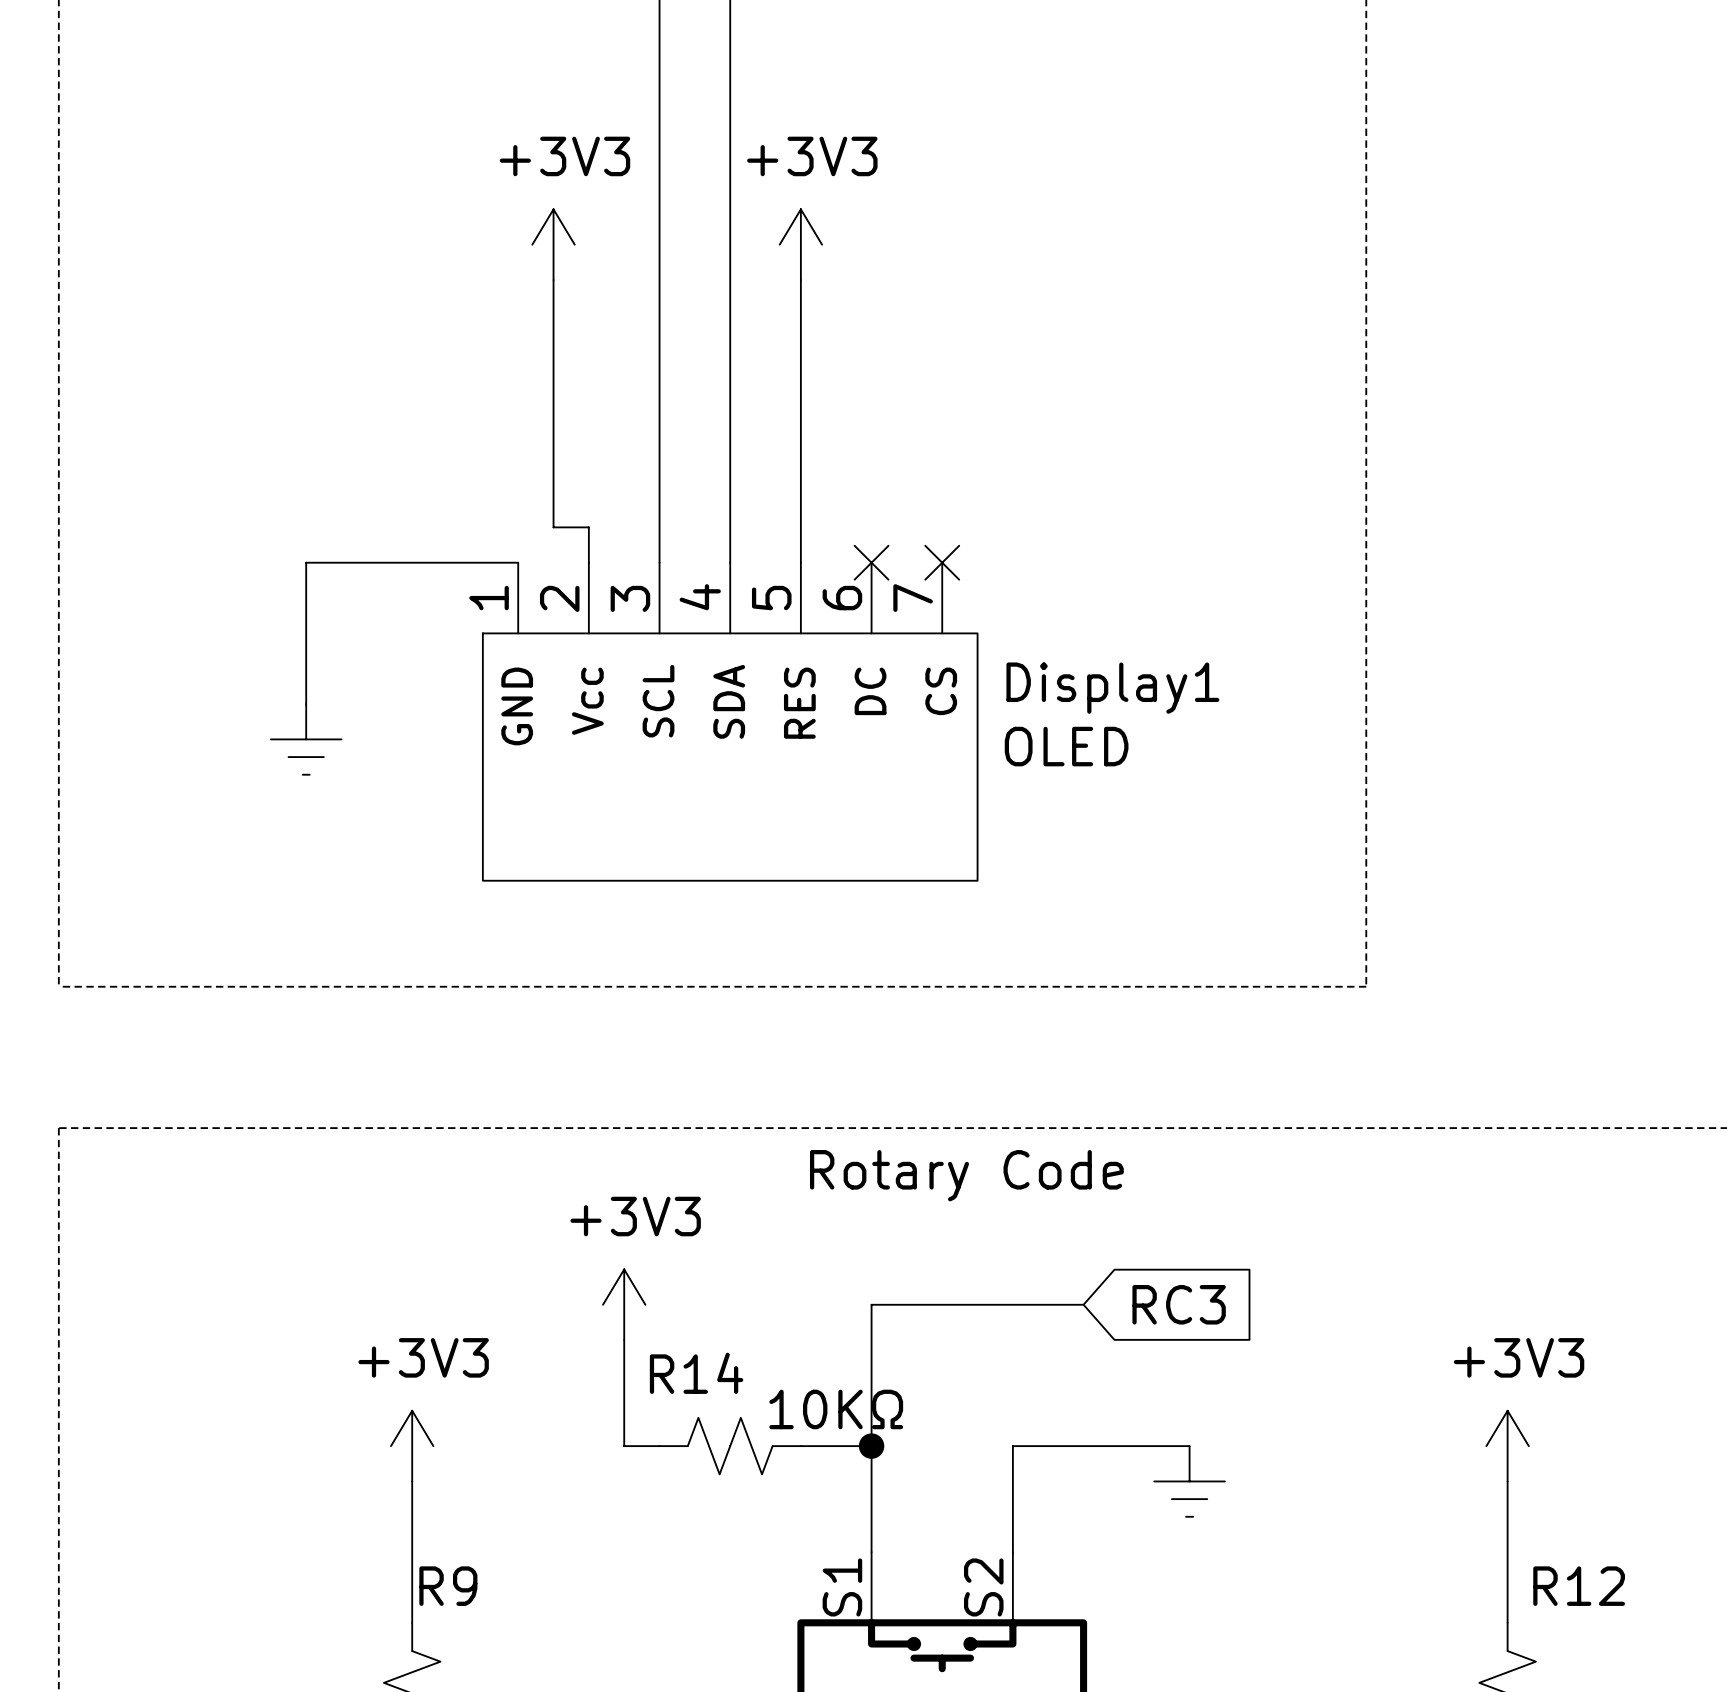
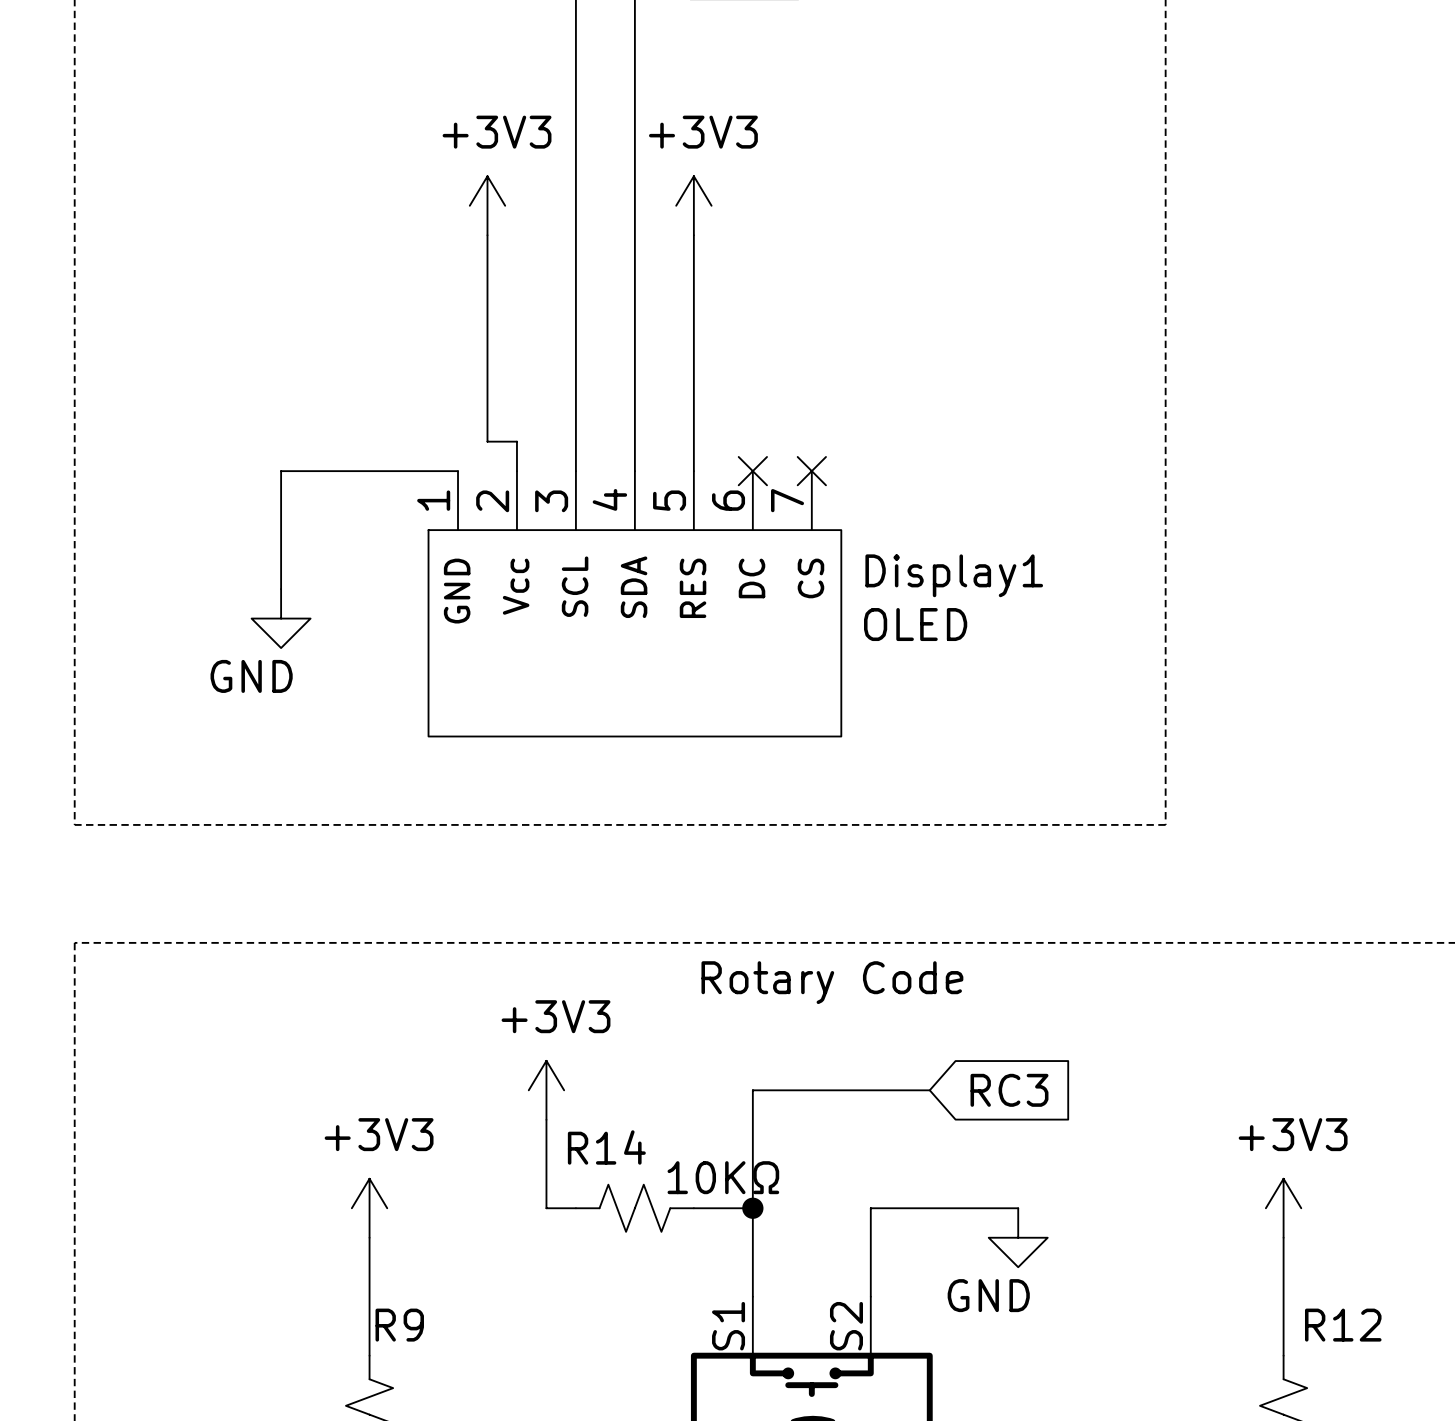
power symbol shape: [270, 704, 342, 775] -> [251, 589, 311, 649]
power symbol text: none -> GND (251, 676)
power symbol shape: [1154, 1446, 1225, 1517] -> [988, 1208, 1048, 1268]
power symbol text: none -> GND (988, 1295)

